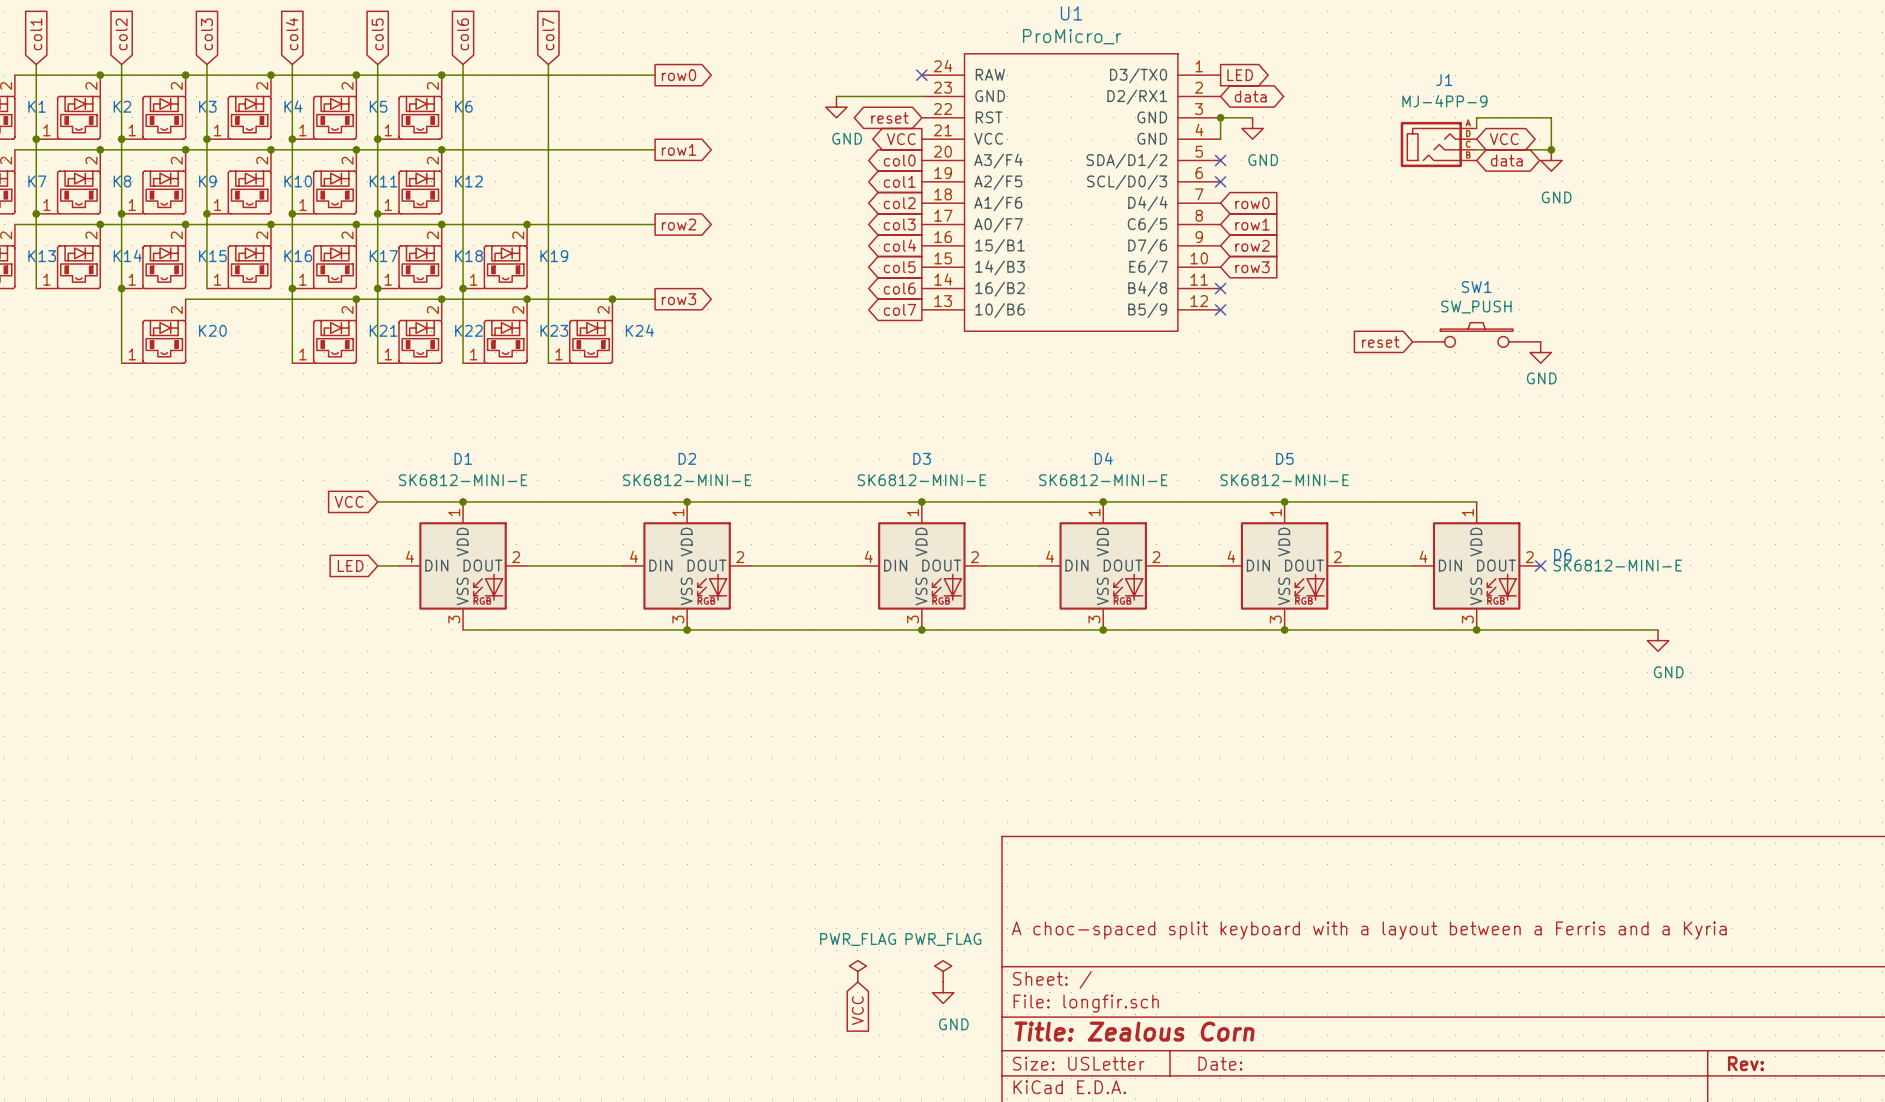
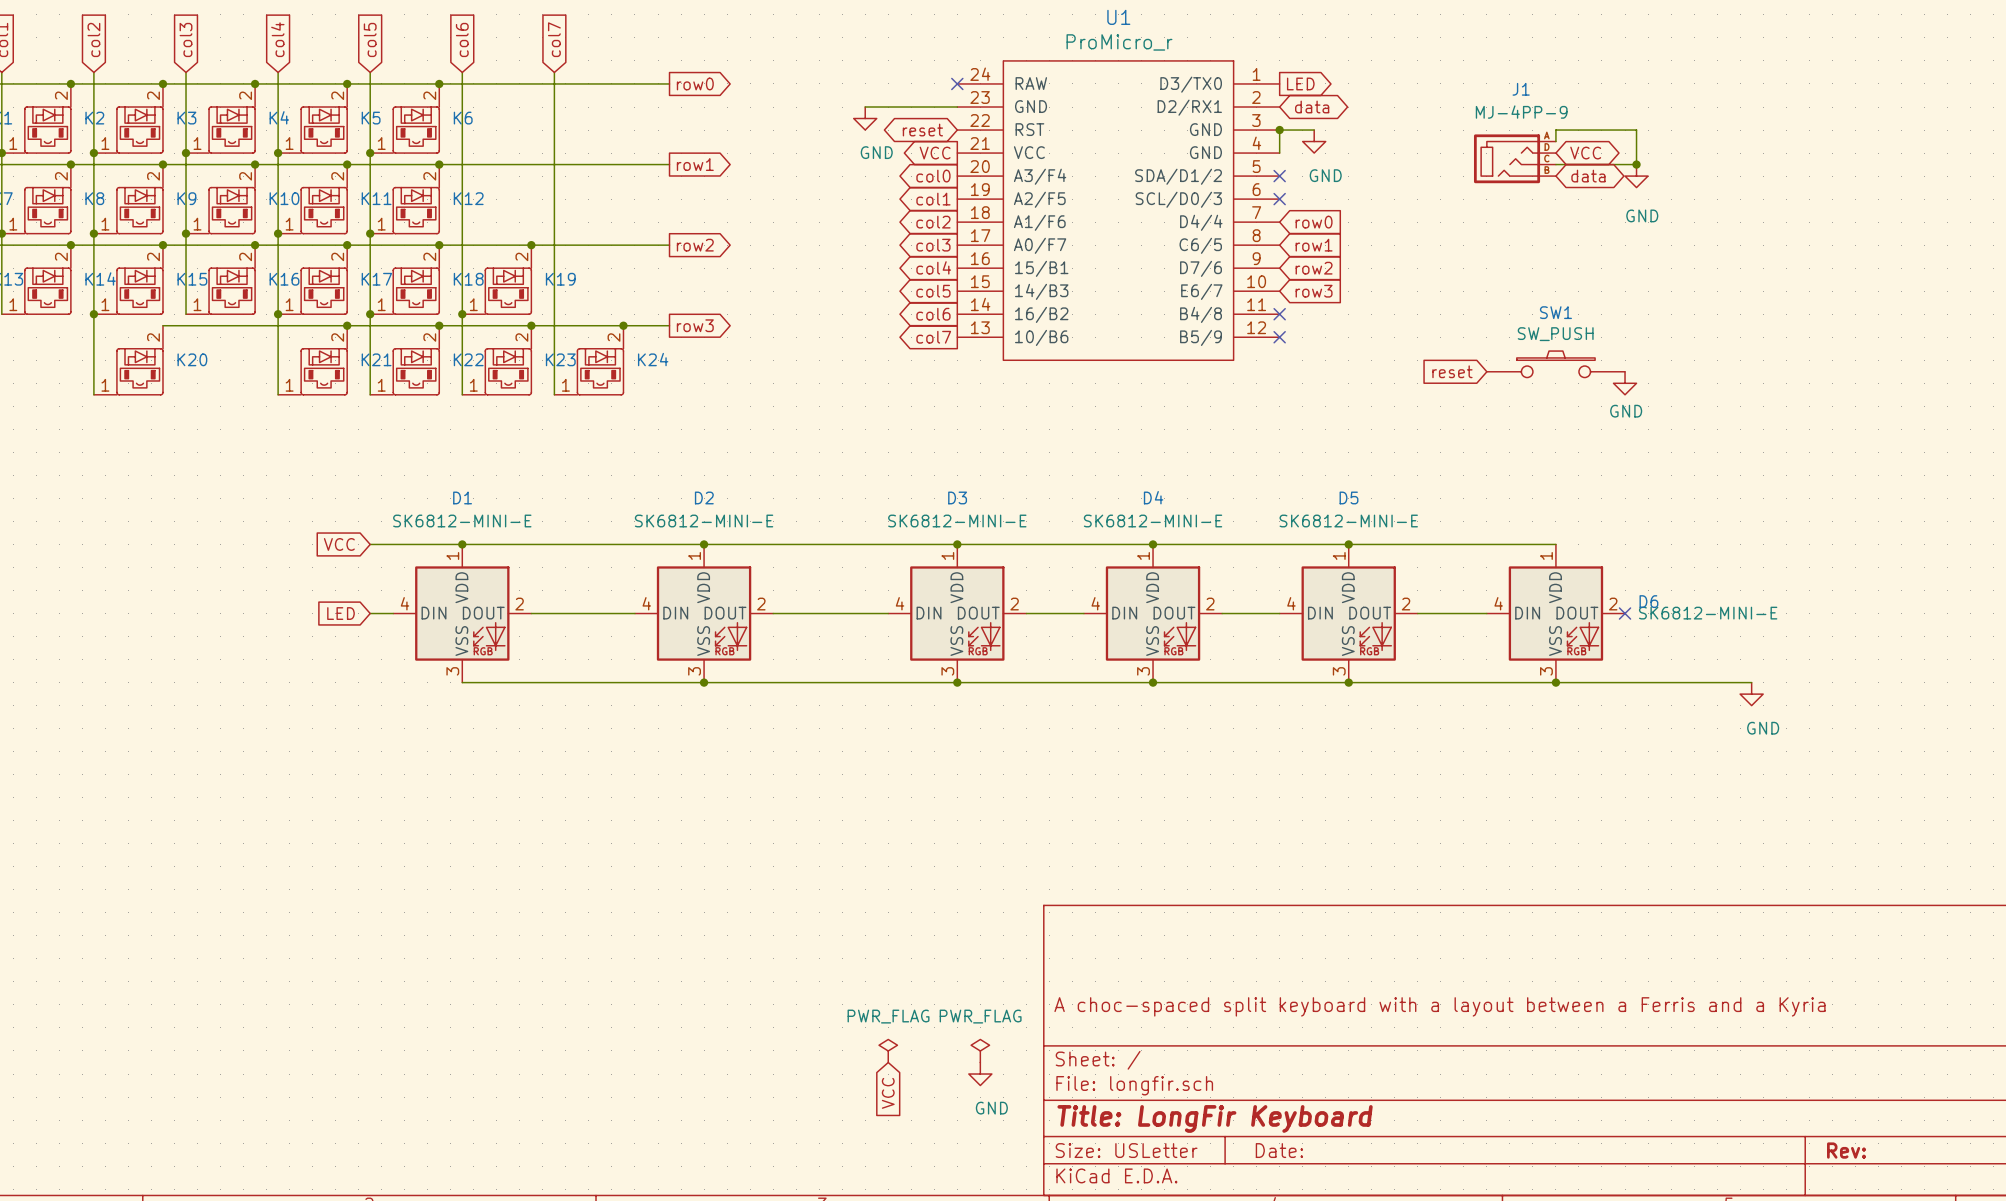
title block: Title: Zealous Corn (1134, 1031) -> Title: LongFir Keyboard (1215, 1118)

